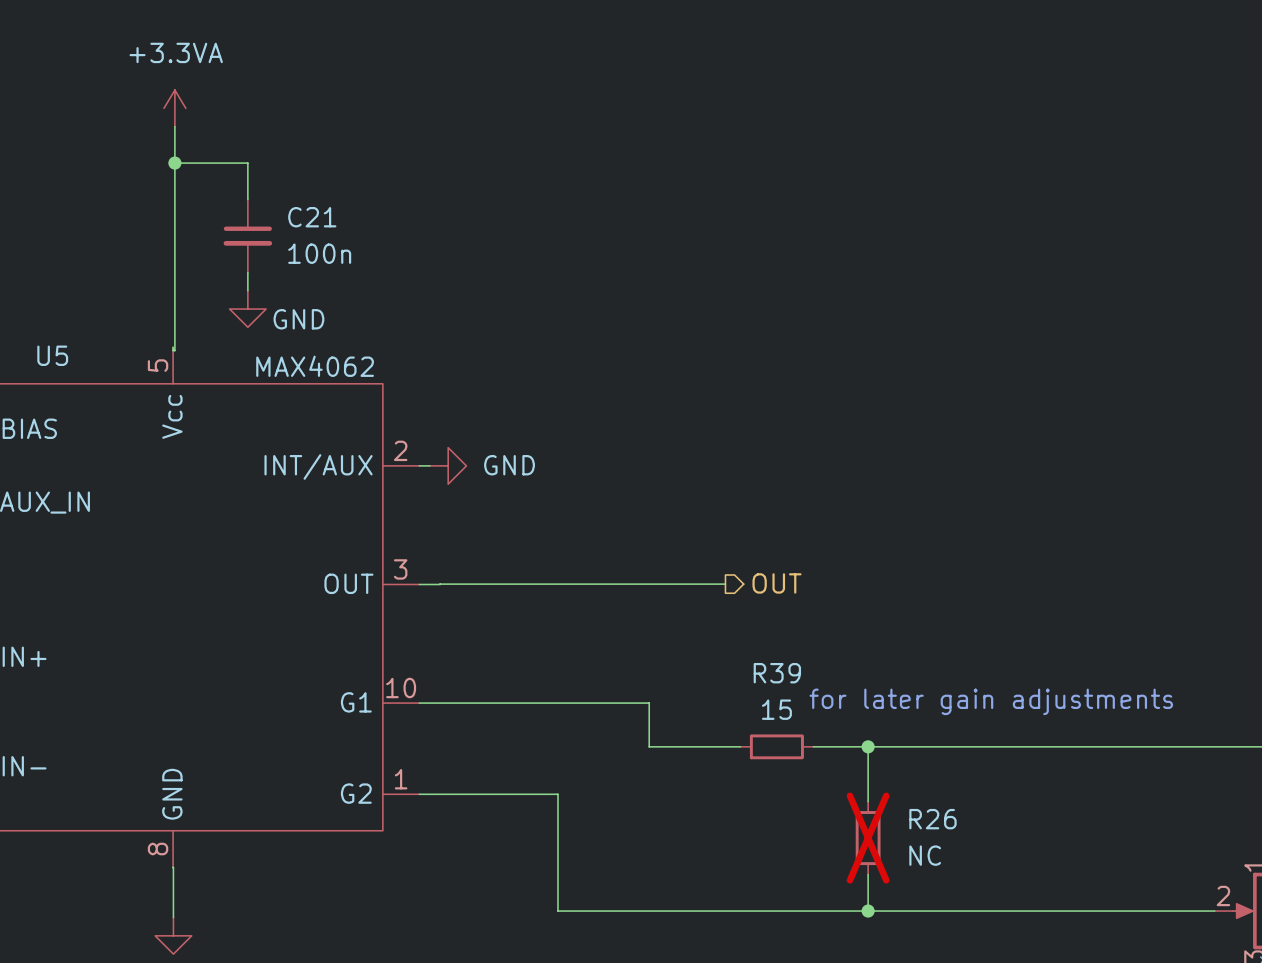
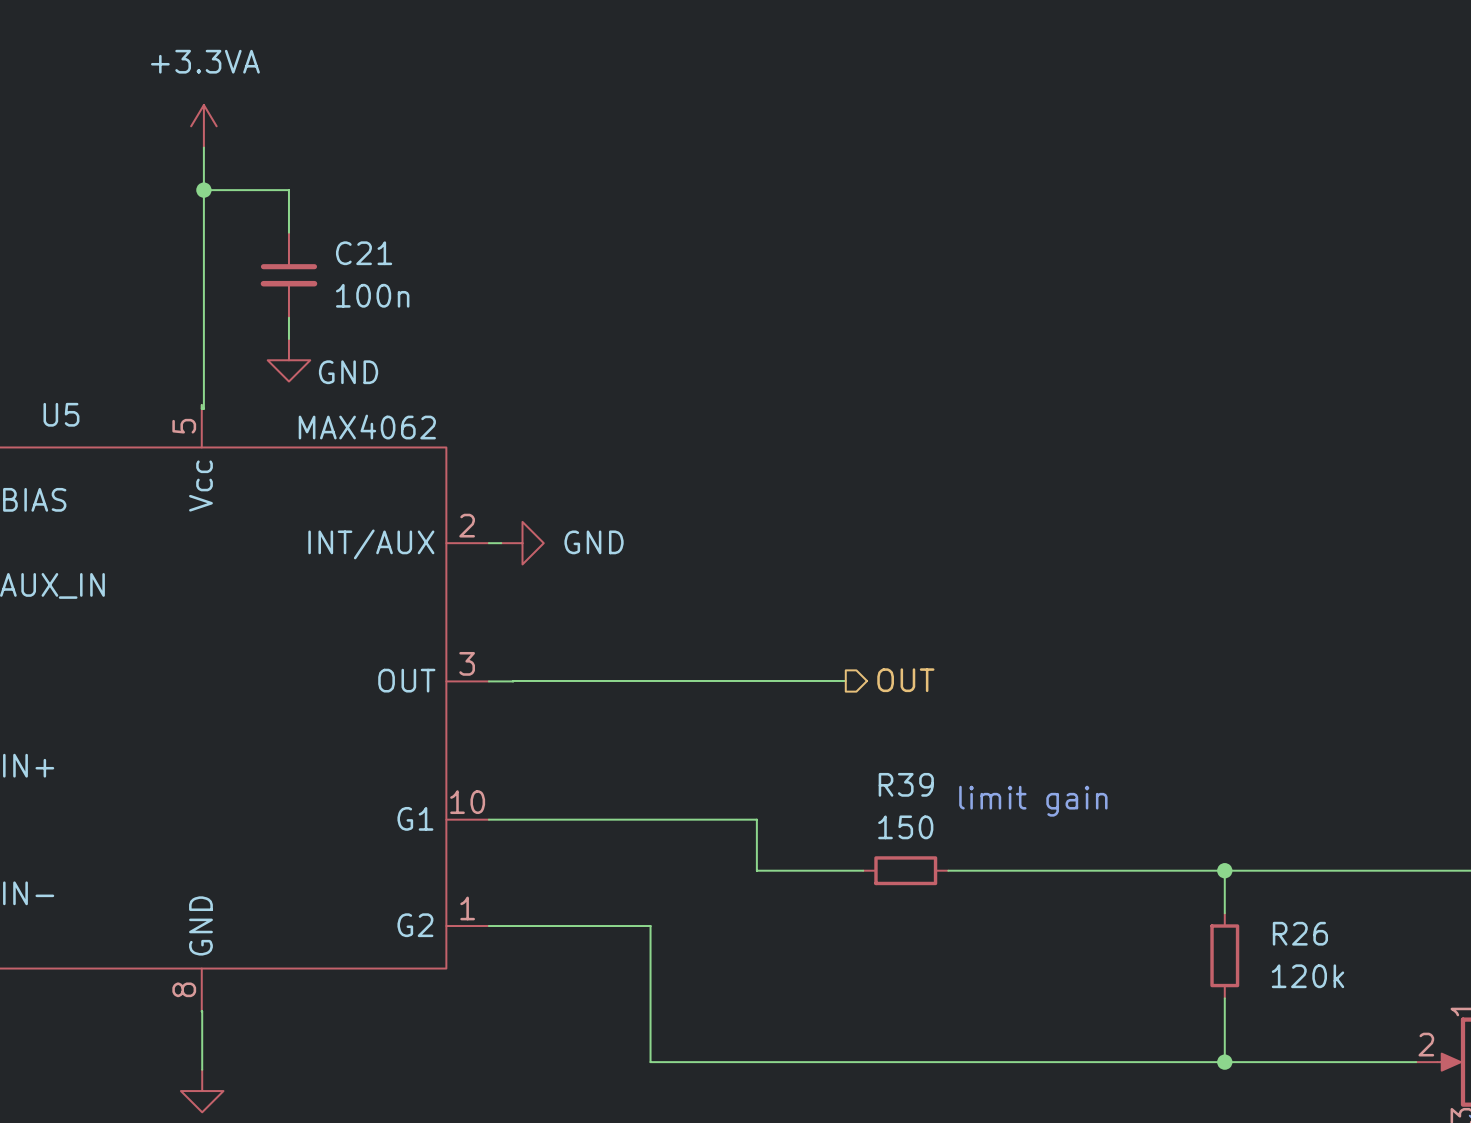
text: none -> limit gain (1033, 801)
text: for later gain adjustments (991, 701) -> none
R39 value: 15 (776, 709) -> 150 (905, 827)
wire: (868, 746) (868, 801) -> (1224, 998) (1224, 1062)
junction: (868, 746) -> none
junction: none -> (1224, 870)
R26 position: (868, 838) -> (1224, 955)
R26 do-not-place cross: (868, 838) -> none
R26 value: NC (925, 855) -> 120k (1308, 976)
wire: (868, 874) (868, 911) -> (1224, 870) (1224, 913)
junction: (868, 911) -> none
junction: none -> (1224, 1062)

